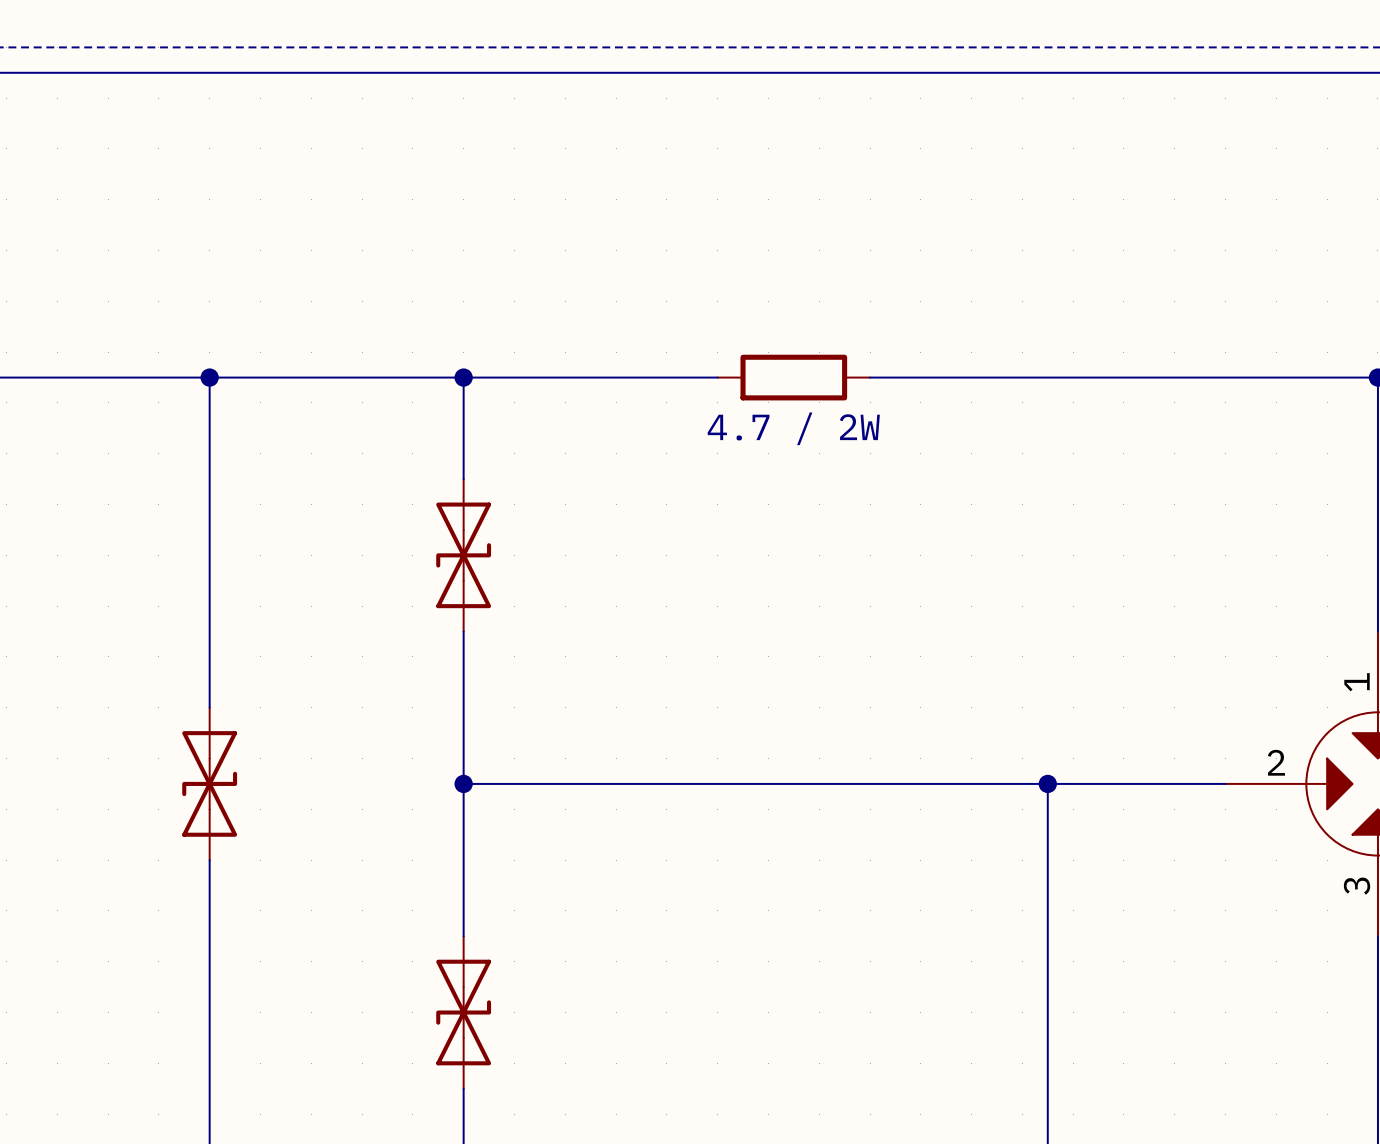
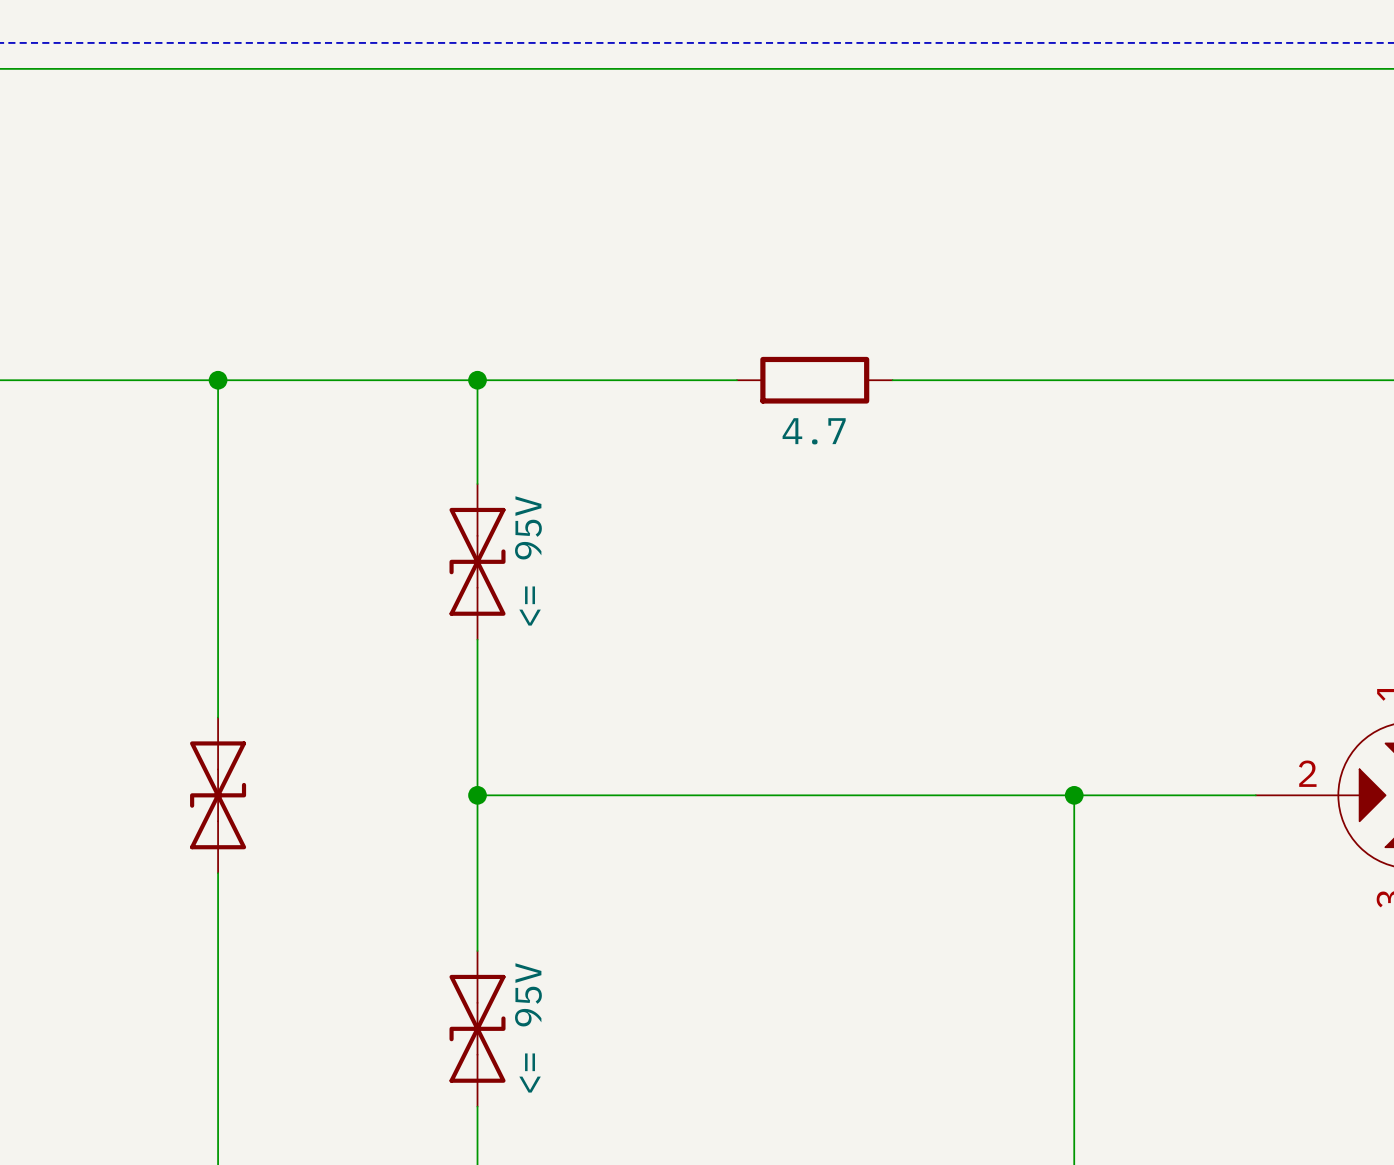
part value: 4.7 / 2W (793, 428) -> 4.7 (814, 431)
part value: none -> <= 95V (528, 560)
part value: none -> <= 95V (528, 1027)

